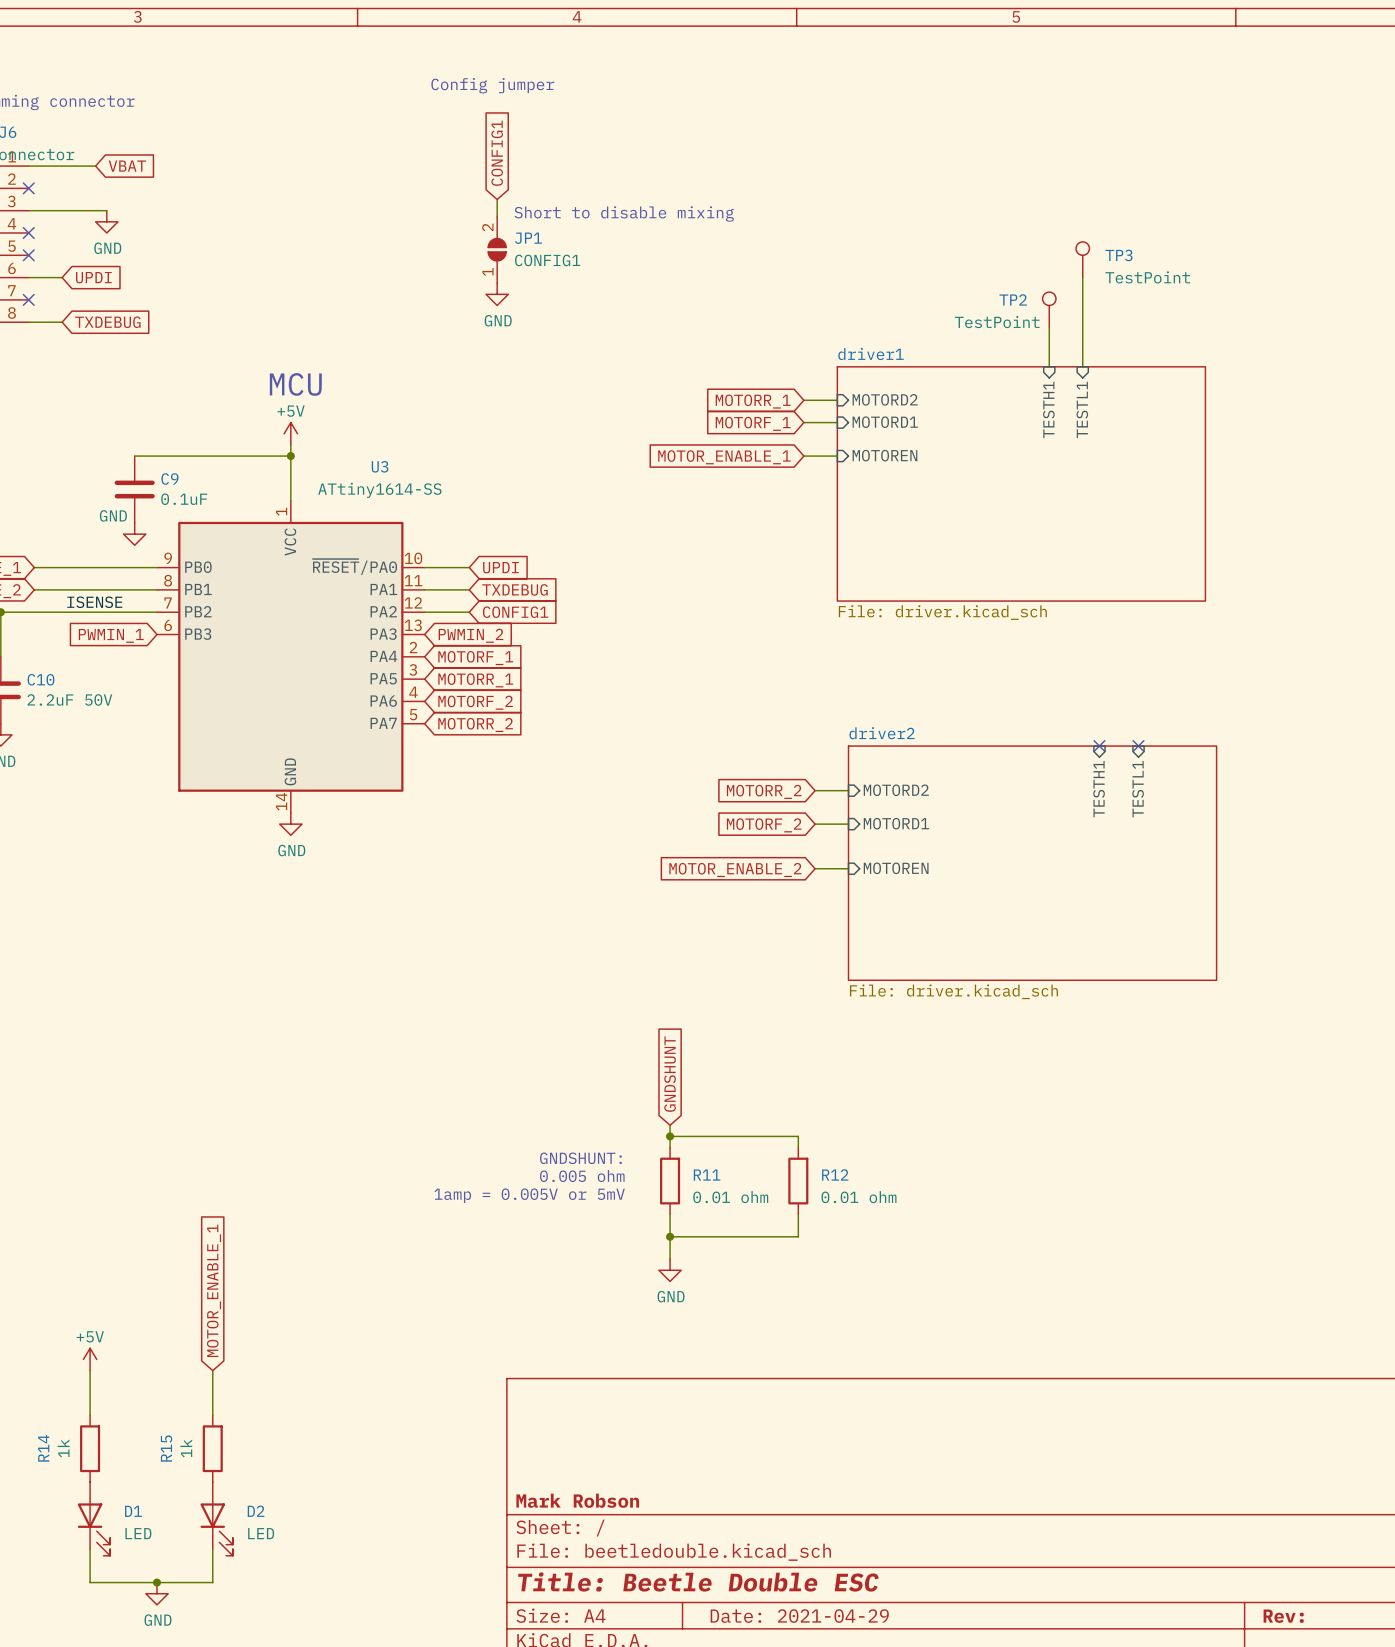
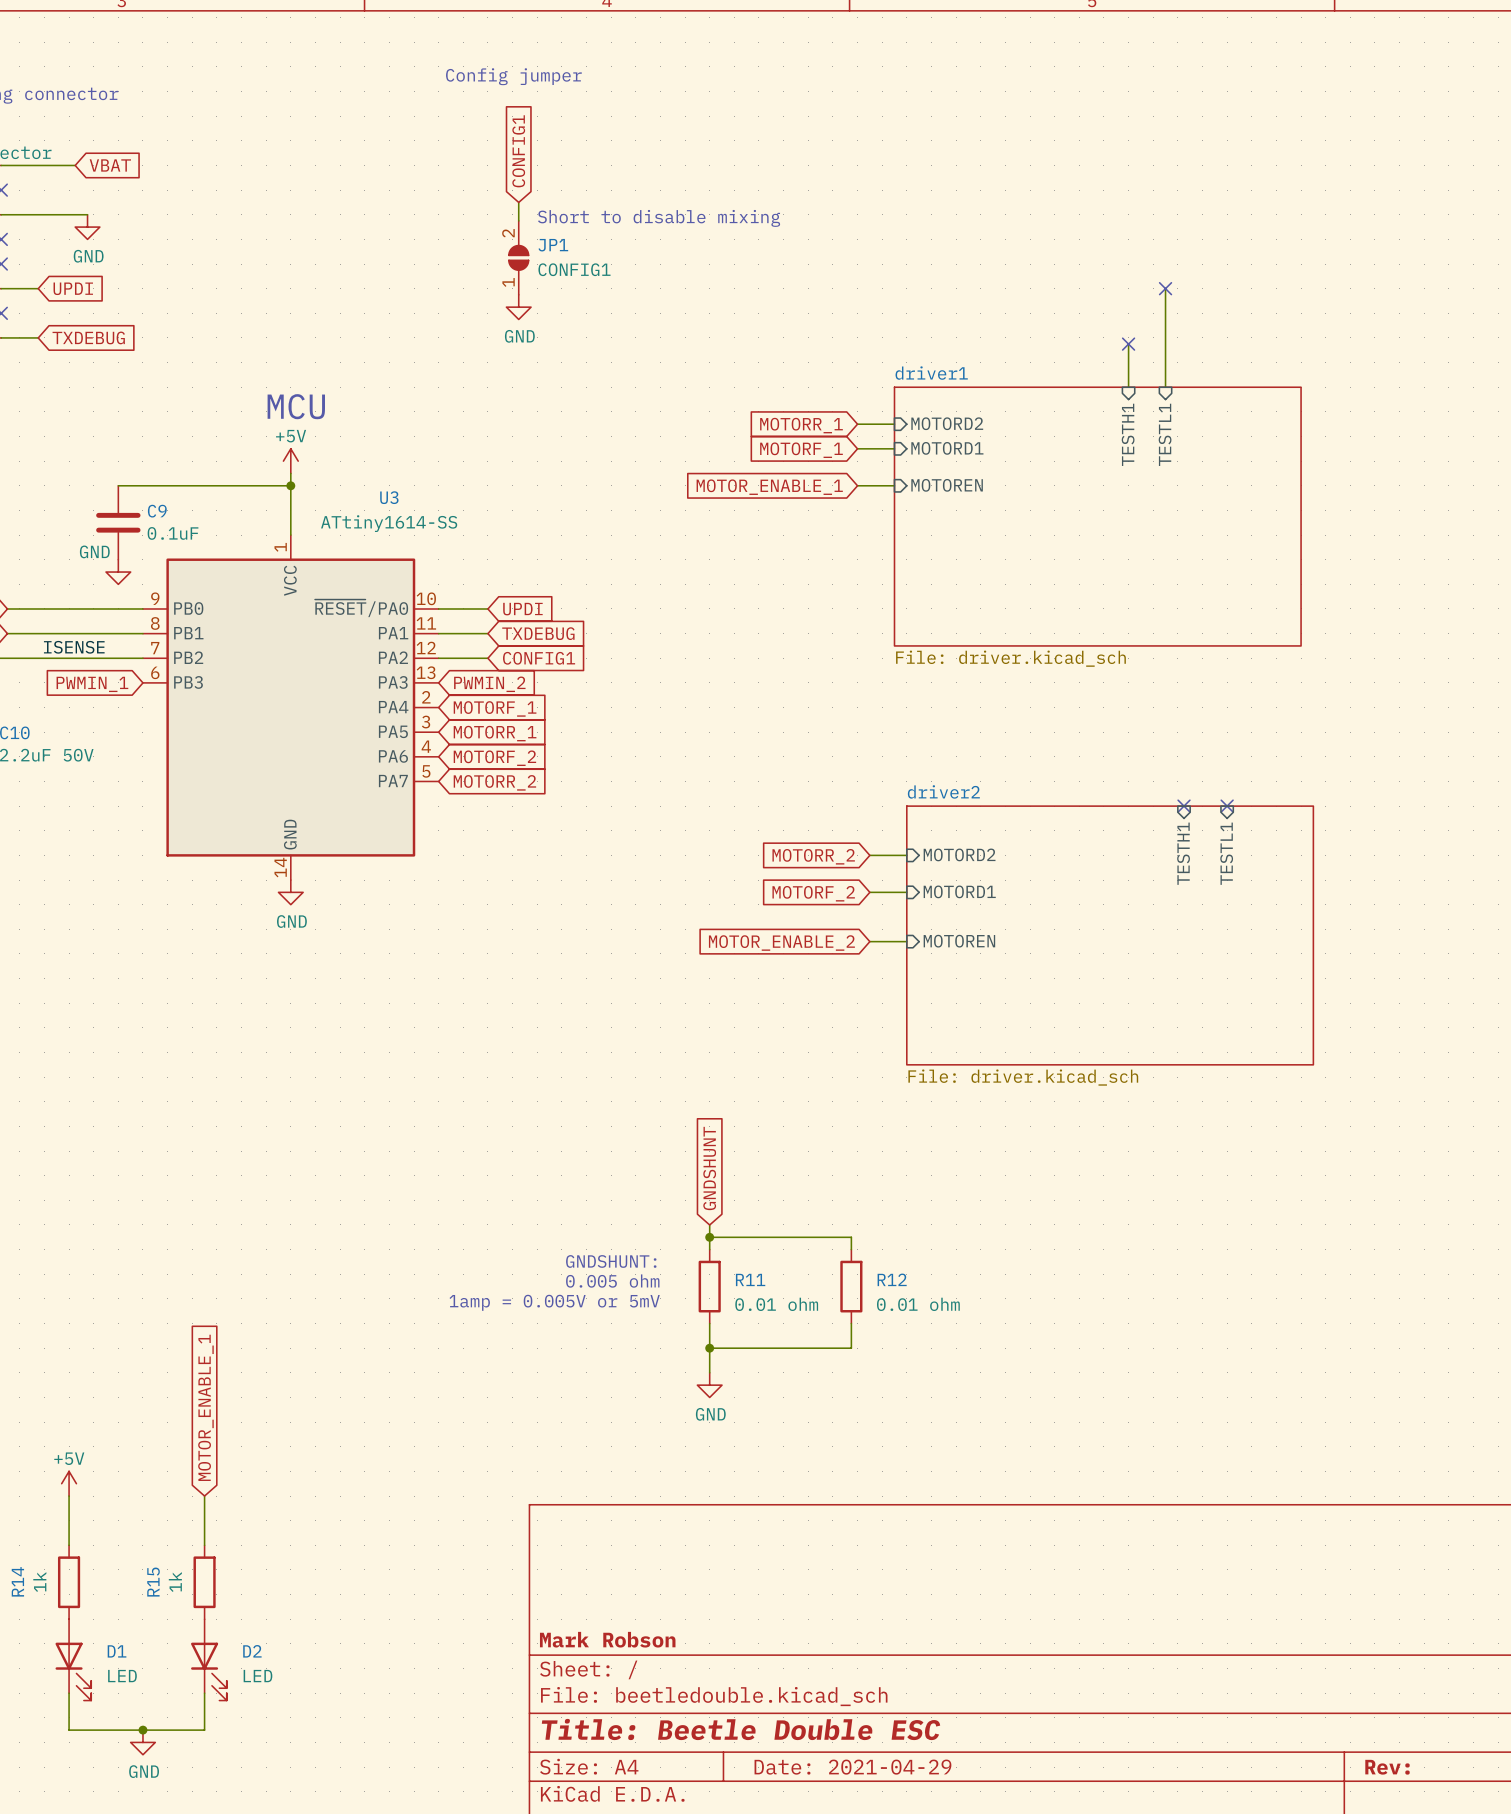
TP3: TestPoint (1082, 259) -> none
no-connect mark: none -> (1165, 288)
TP2: TestPoint (1049, 309) -> none
no-connect mark: none -> (1128, 344)

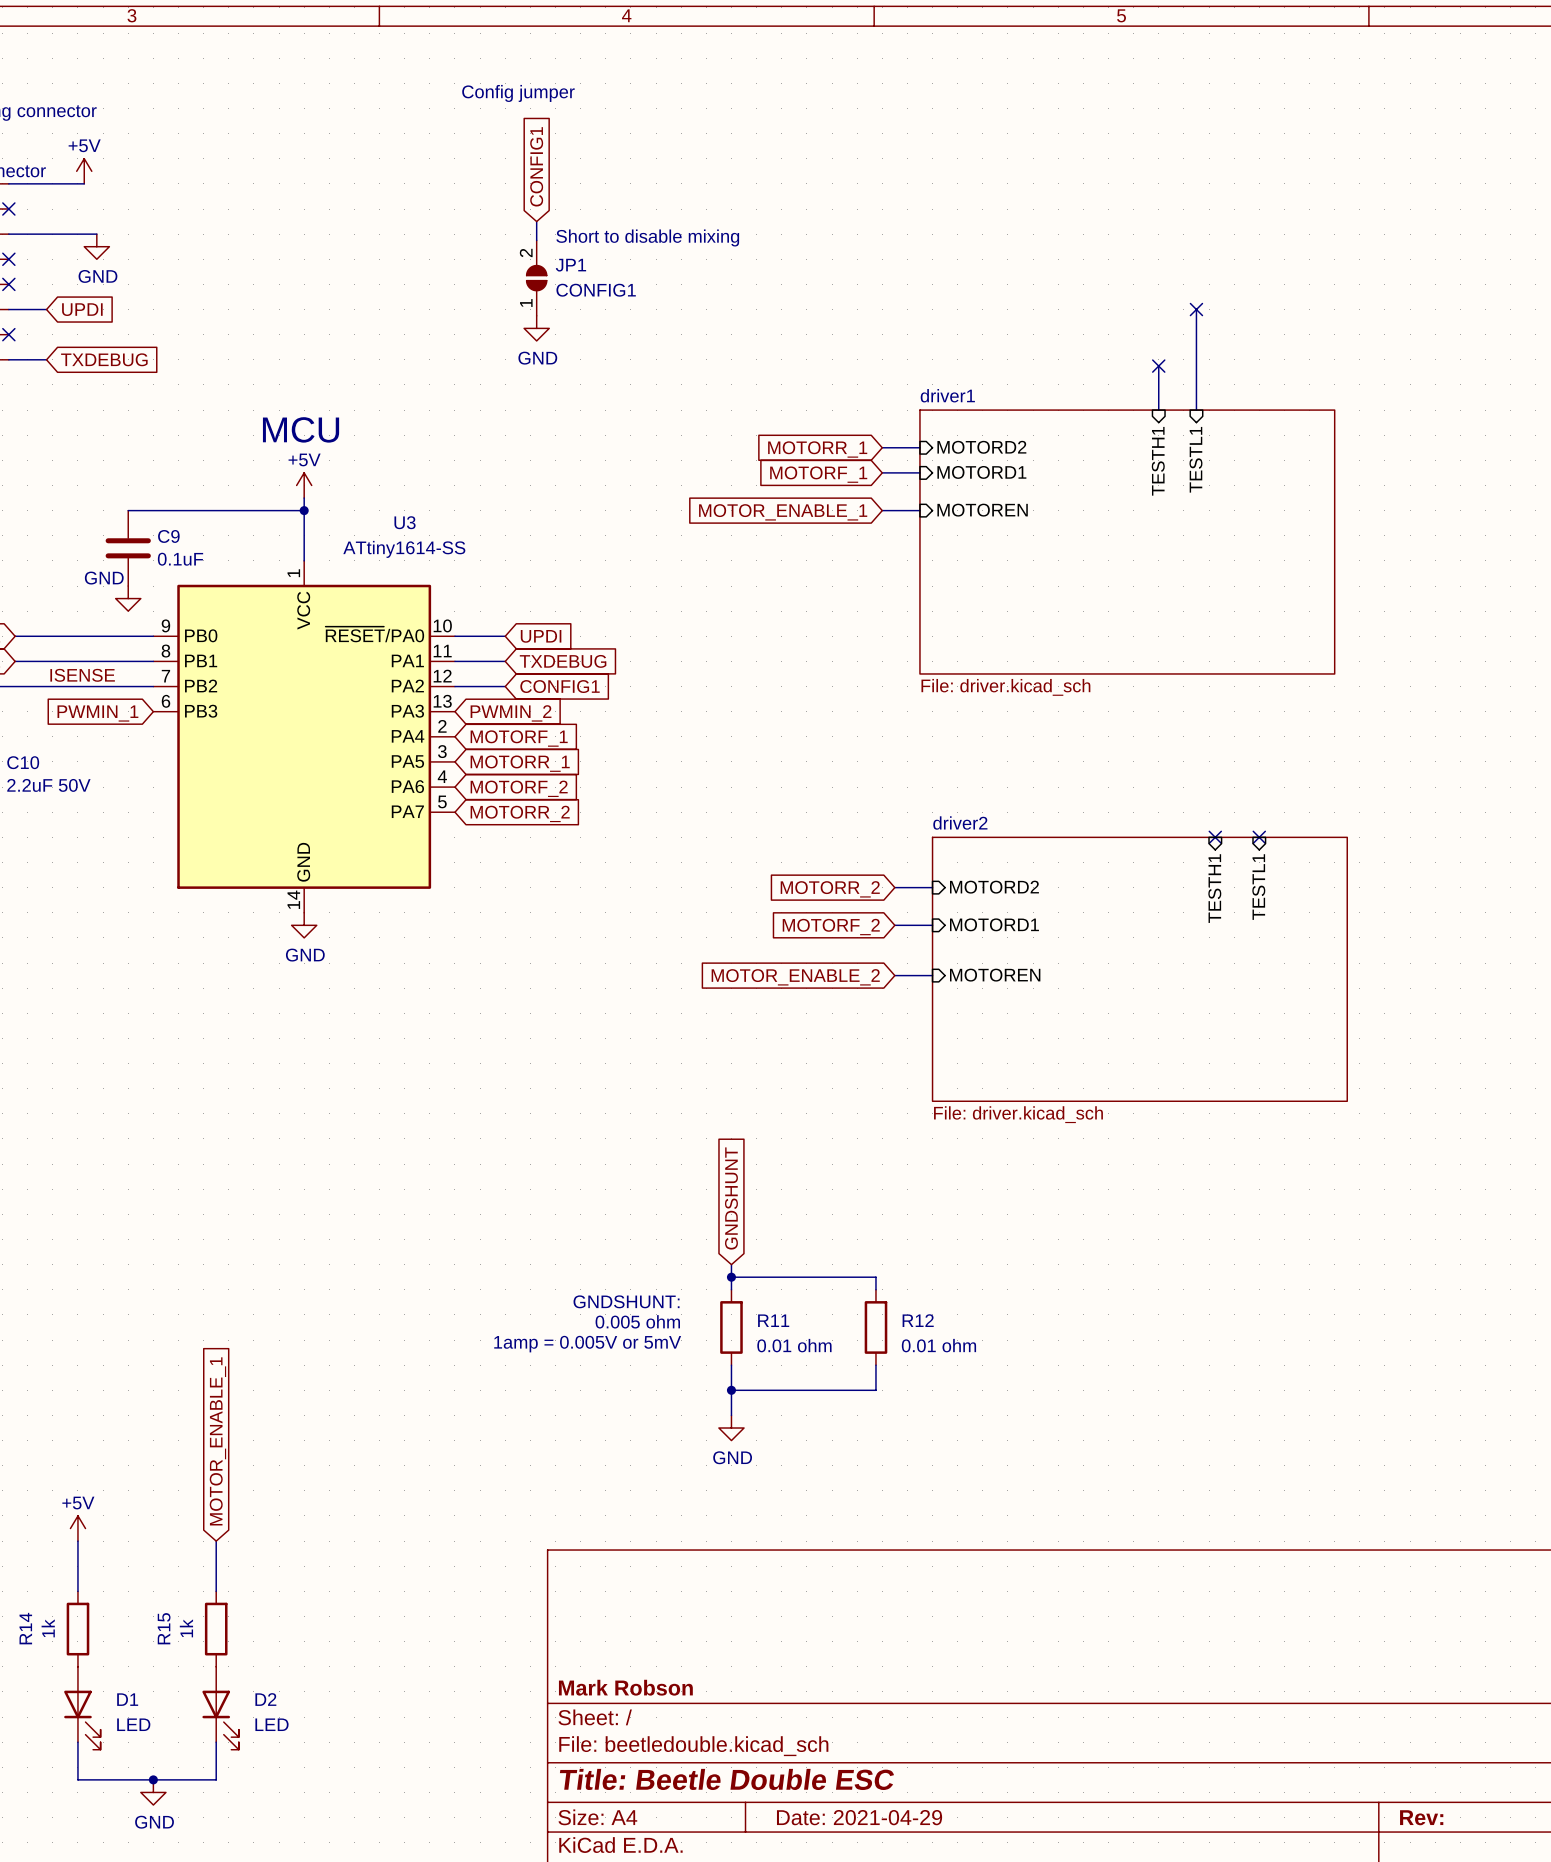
power symbol: none -> +5V (84, 171)
global label: VBAT (110, 165) -> none

